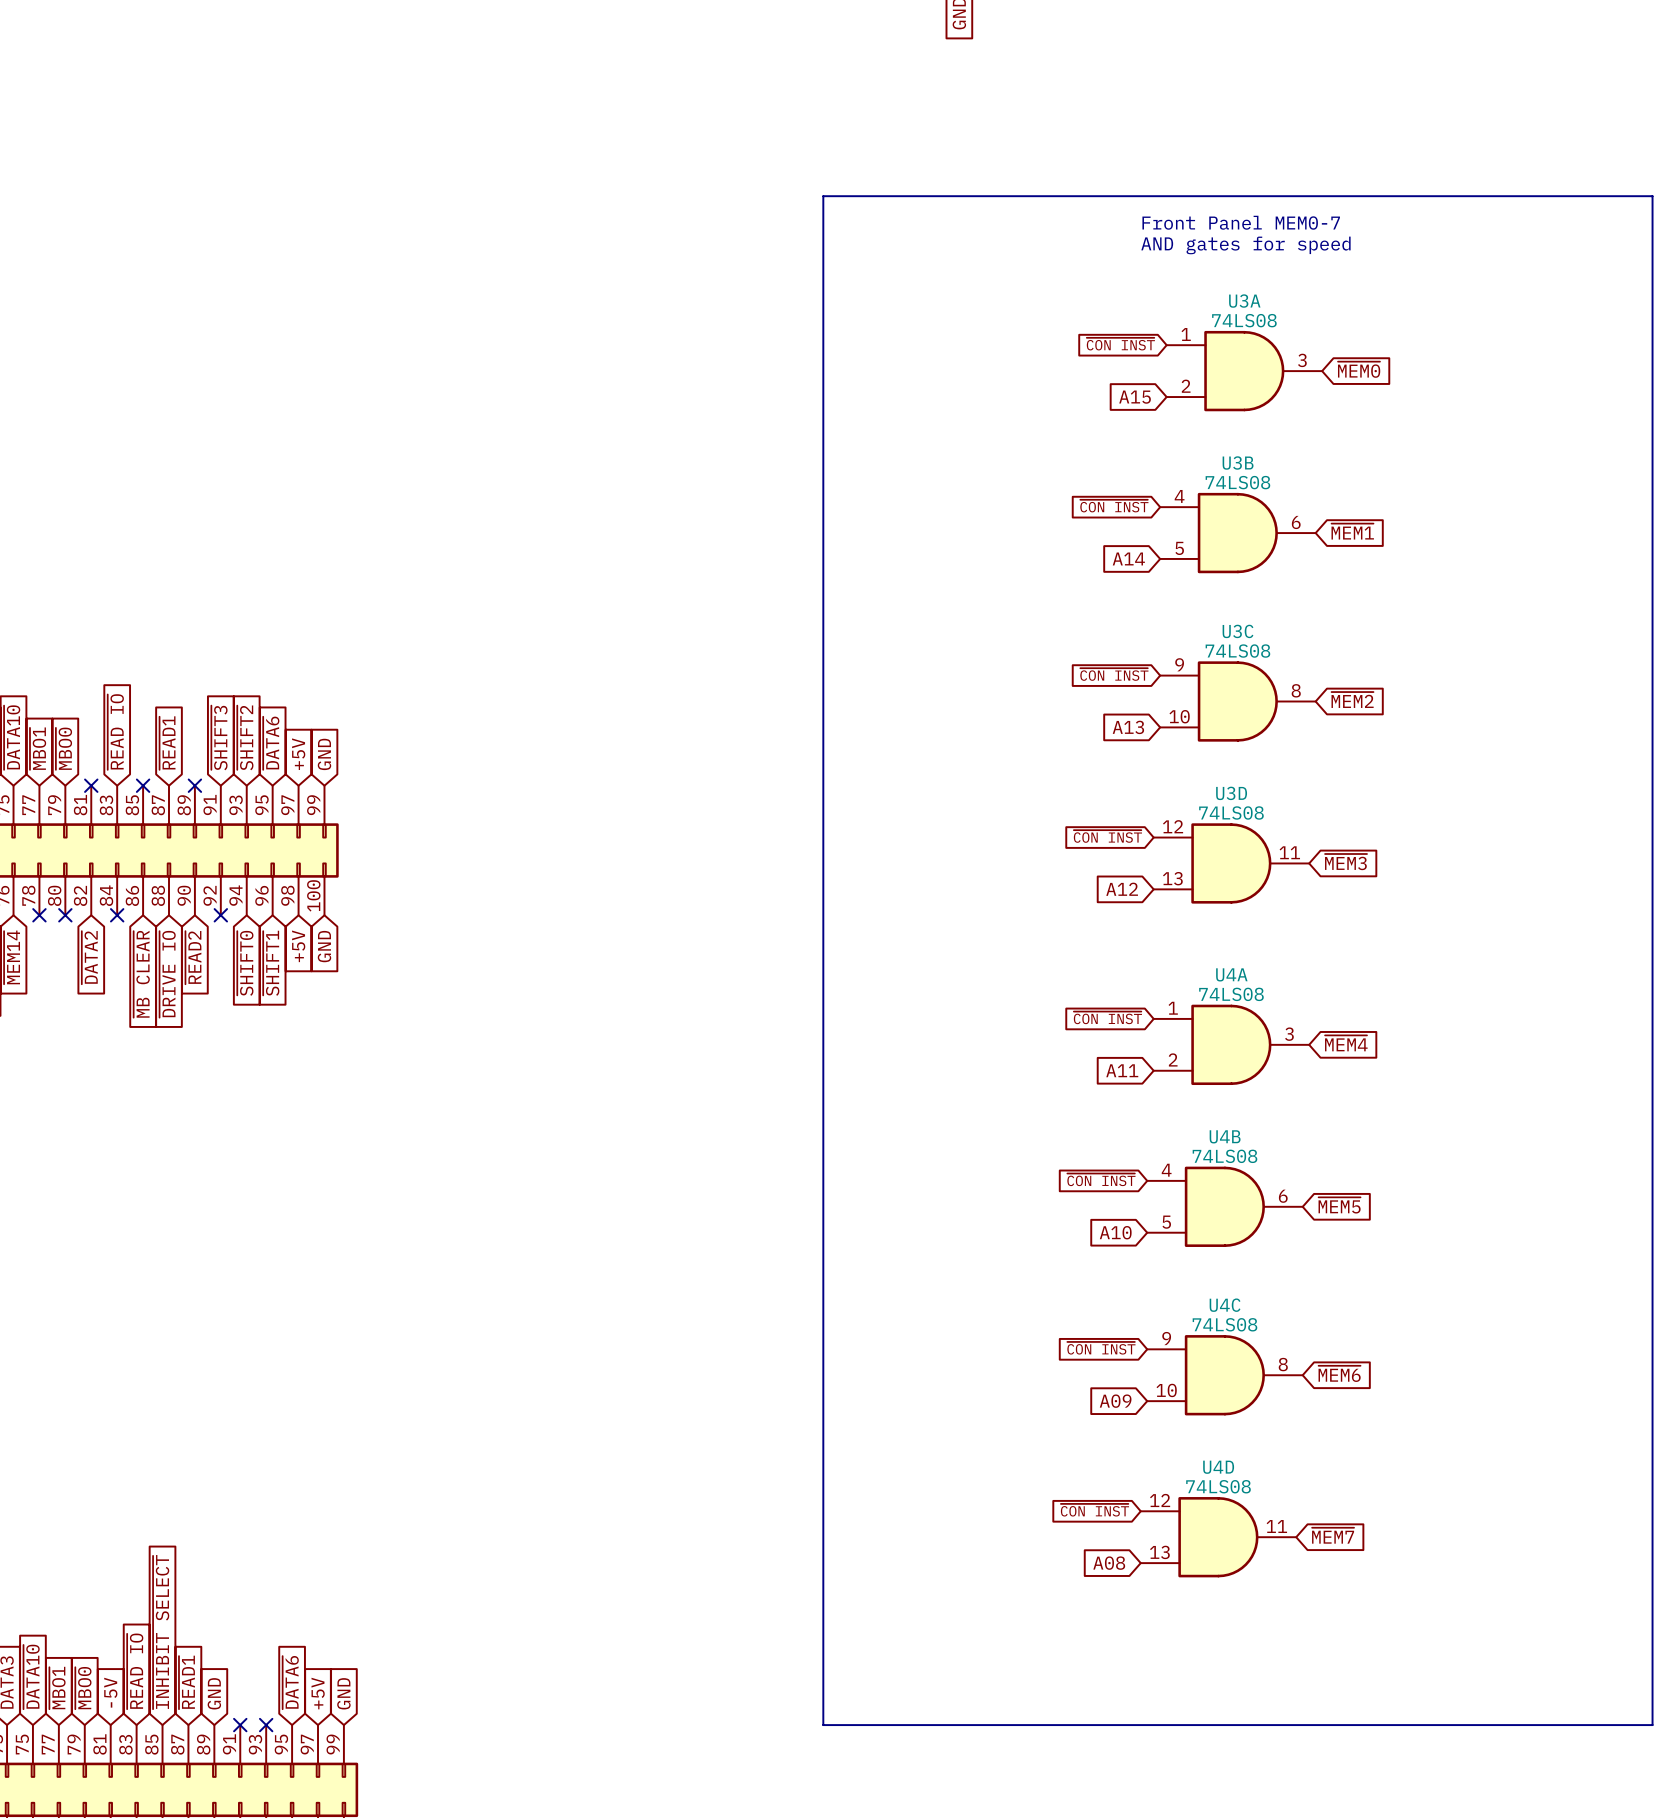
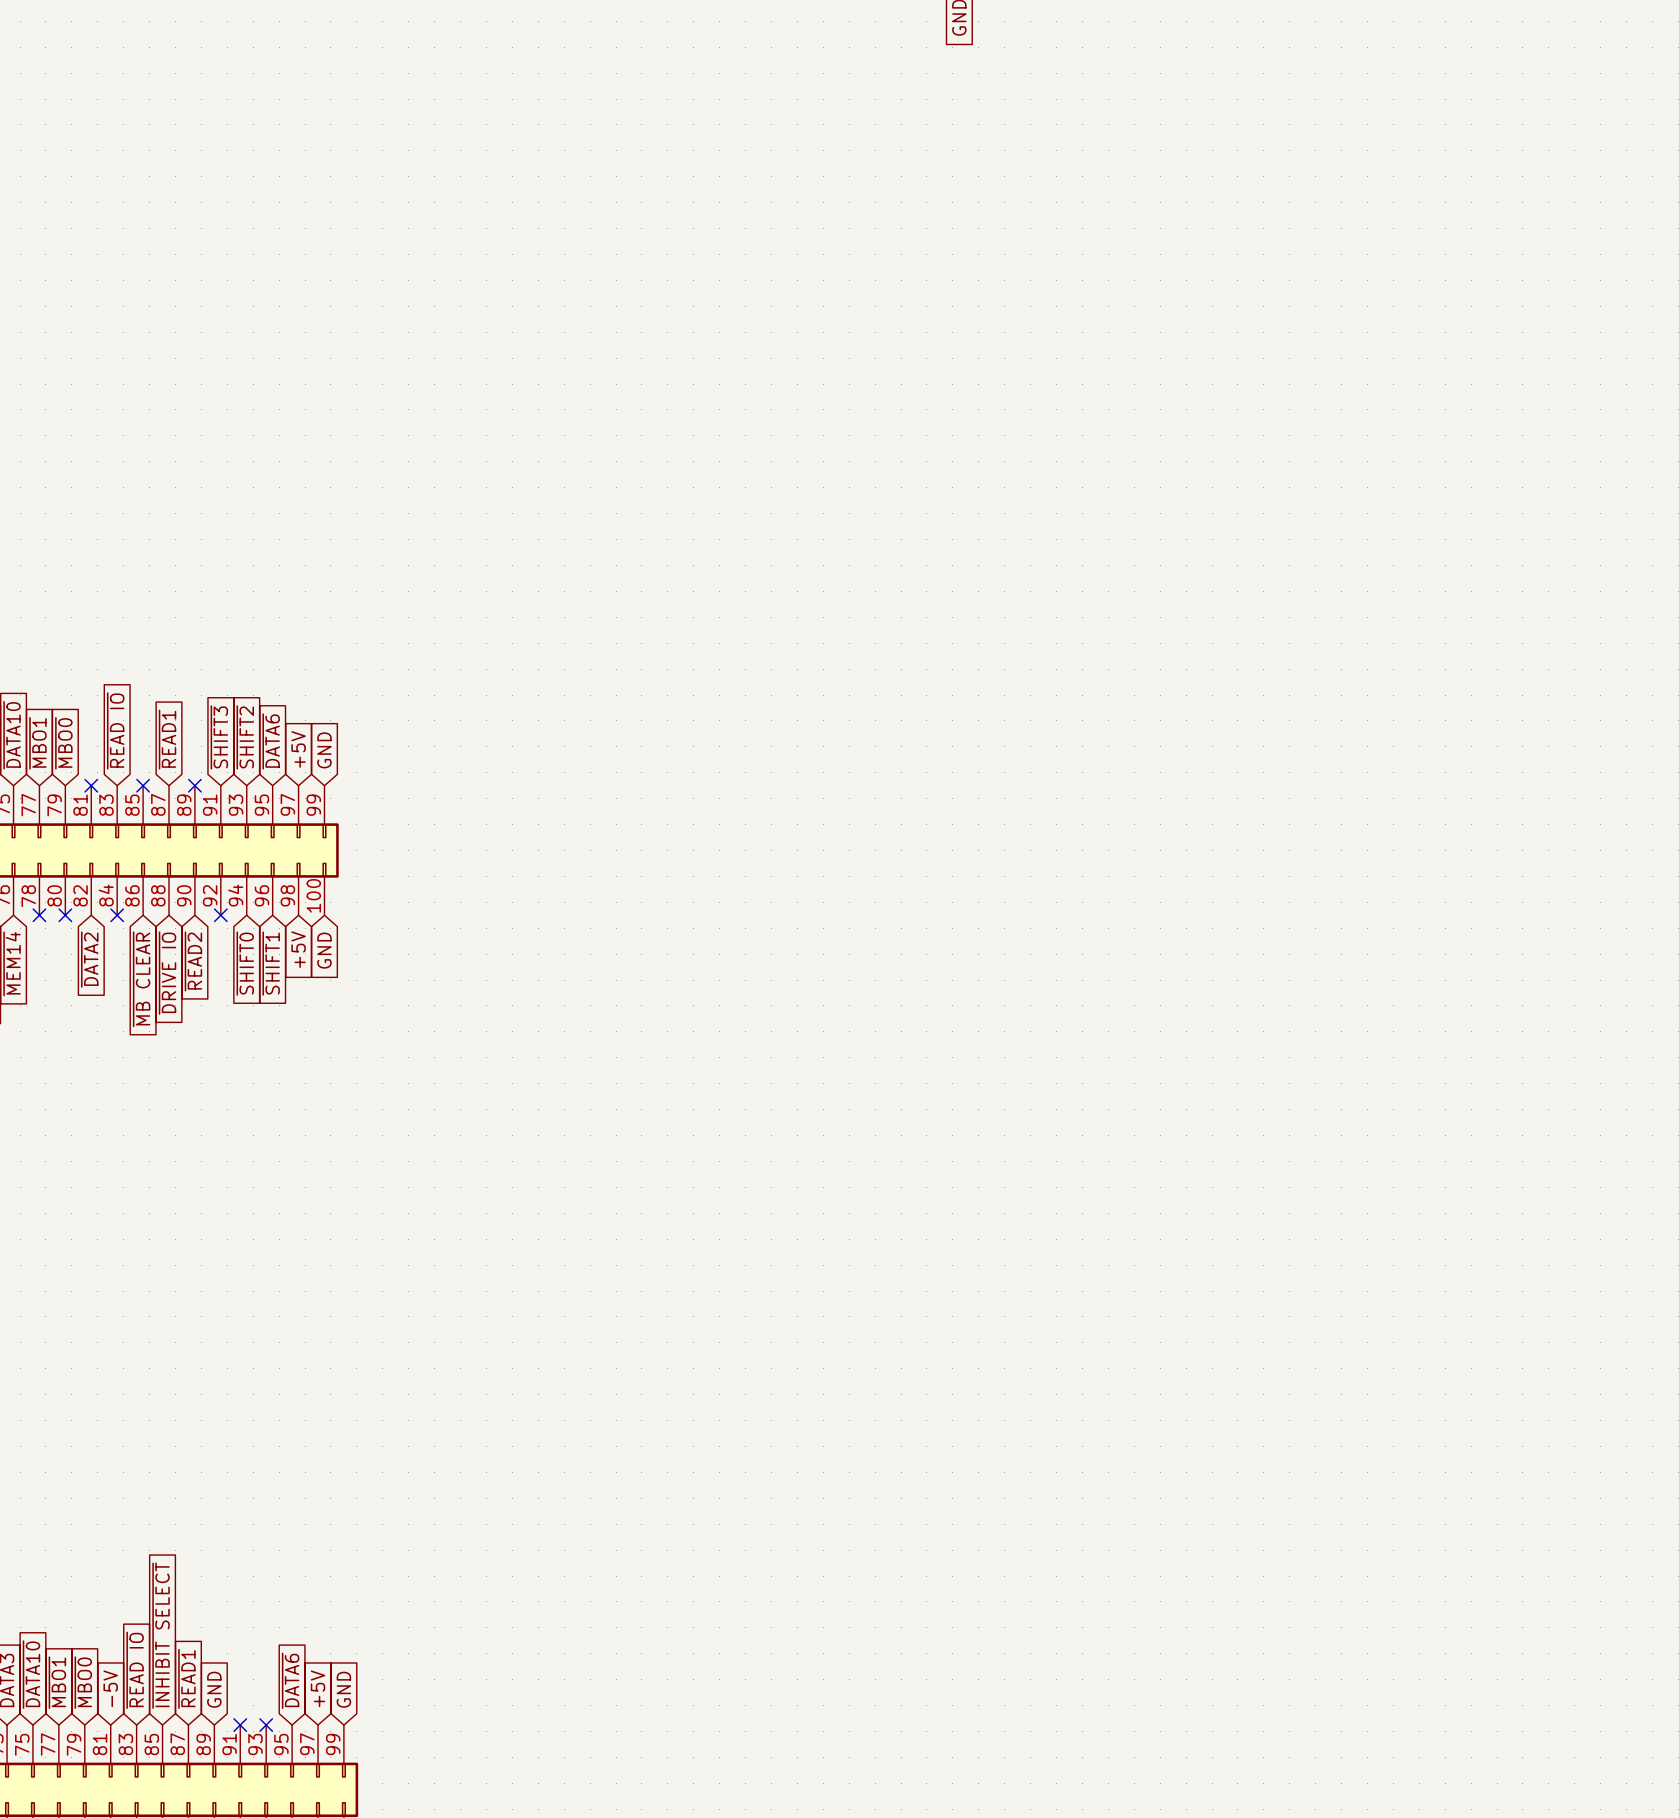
line: (823, 196) (1652, 196) (1652, 1725) (823, 1725) (823, 196) -> none
text: Front Panel MEM0-7 (1241, 222) -> none
text: AND gates for speed (1245, 245) -> none
global label: ~{CON INST} (1120, 344) -> none
global label: ~{MEM0} (1359, 369) -> none
U3A: 74LS08 (1244, 371) -> none
global label: A15 (1135, 397) -> none
global label: ~{CON INST} (1114, 506) -> none
global label: ~{MEM1} (1352, 531) -> none
U3B: 74LS08 (1237, 533) -> none
global label: A14 (1128, 558) -> none
global label: ~{CON INST} (1114, 674) -> none
global label: ~{MEM2} (1352, 700) -> none
U3C: 74LS08 (1237, 701) -> none
global label: A13 (1128, 727) -> none
global label: ~{CON INST} (1107, 836) -> none
global label: ~{MEM3} (1346, 862) -> none
U3D: 74LS08 (1231, 863) -> none
global label: A12 (1122, 889) -> none
global label: ~{CON INST} (1107, 1017) -> none
global label: ~{MEM4} (1346, 1043) -> none
U4A: 74LS08 (1231, 1044) -> none
global label: A11 (1122, 1070) -> none
global label: ~{CON INST} (1101, 1179) -> none
global label: ~{MEM5} (1339, 1205) -> none
U4B: 74LS08 (1224, 1206) -> none
global label: A10 (1115, 1232) -> none
global label: ~{CON INST} (1101, 1348) -> none
global label: ~{MEM6} (1339, 1373) -> none
U4C: 74LS08 (1224, 1375) -> none
global label: A09 (1115, 1401) -> none
global label: ~{CON INST} (1094, 1510) -> none
global label: ~{MEM7} (1333, 1535) -> none
U4D: 74LS08 (1218, 1537) -> none
global label: A08 (1109, 1563) -> none

